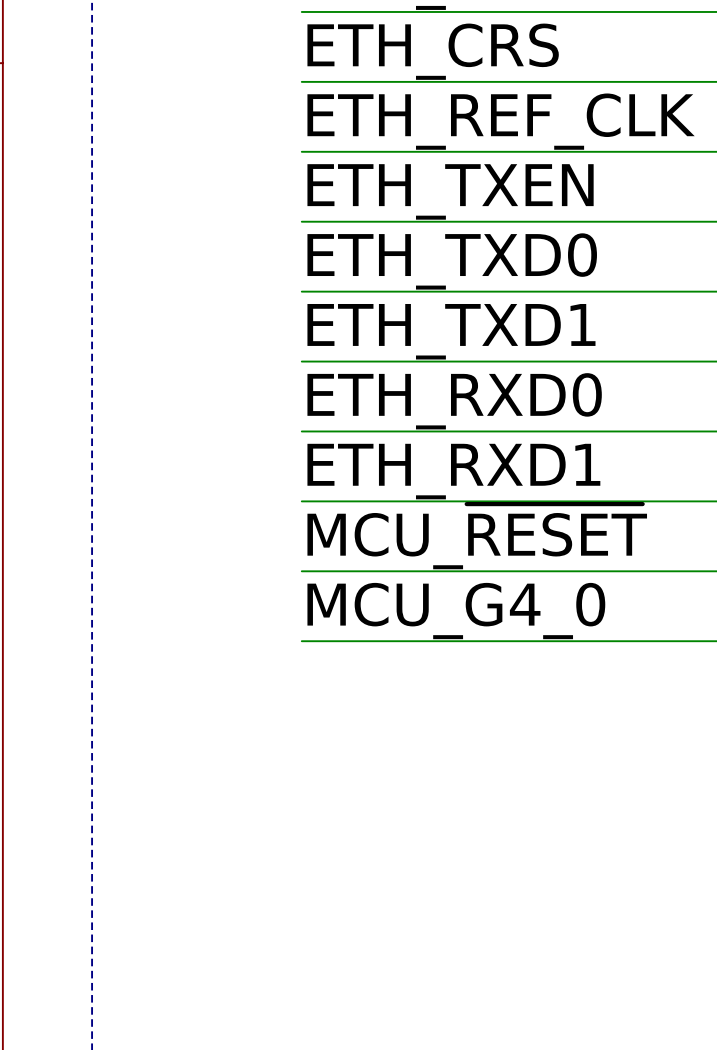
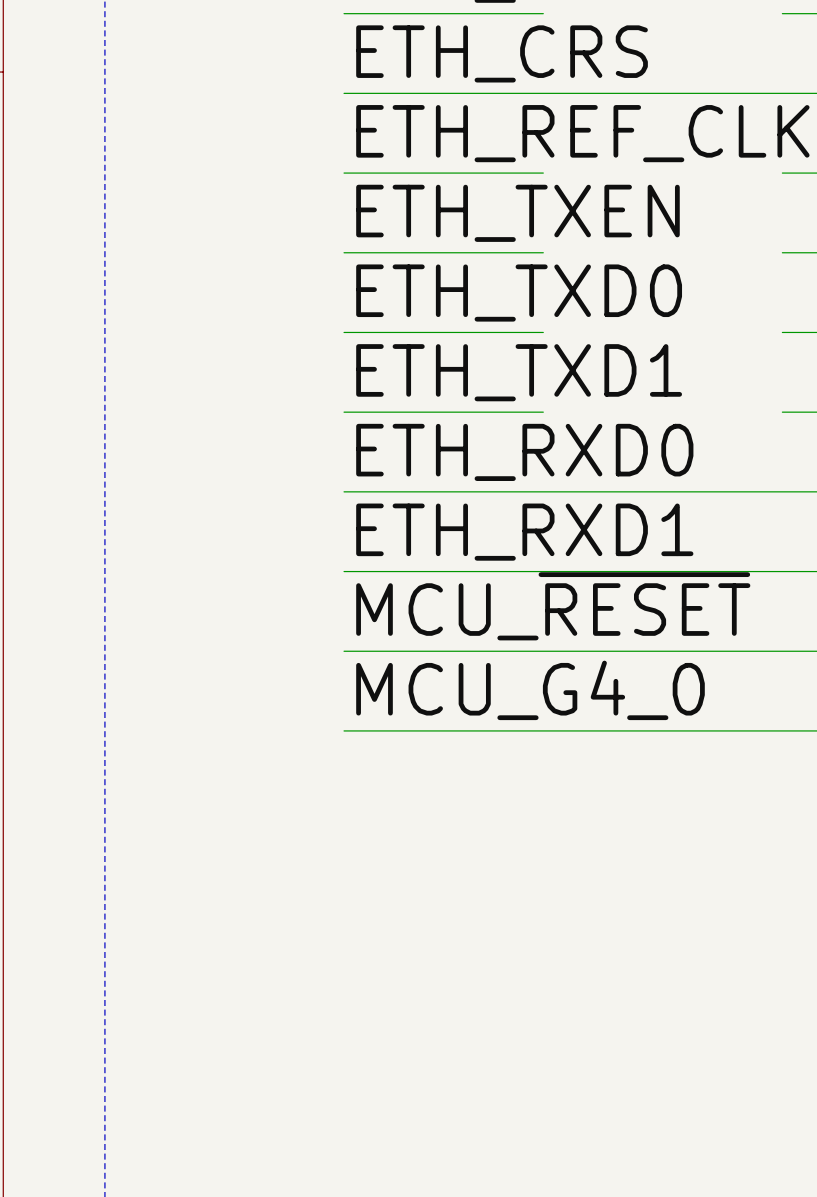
wire: (476, 11) (686, 11) -> none
wire: (476, 151) (686, 151) -> none
wire: (476, 221) (686, 221) -> none
wire: (476, 291) (686, 291) -> none
wire: (476, 361) (686, 361) -> none

